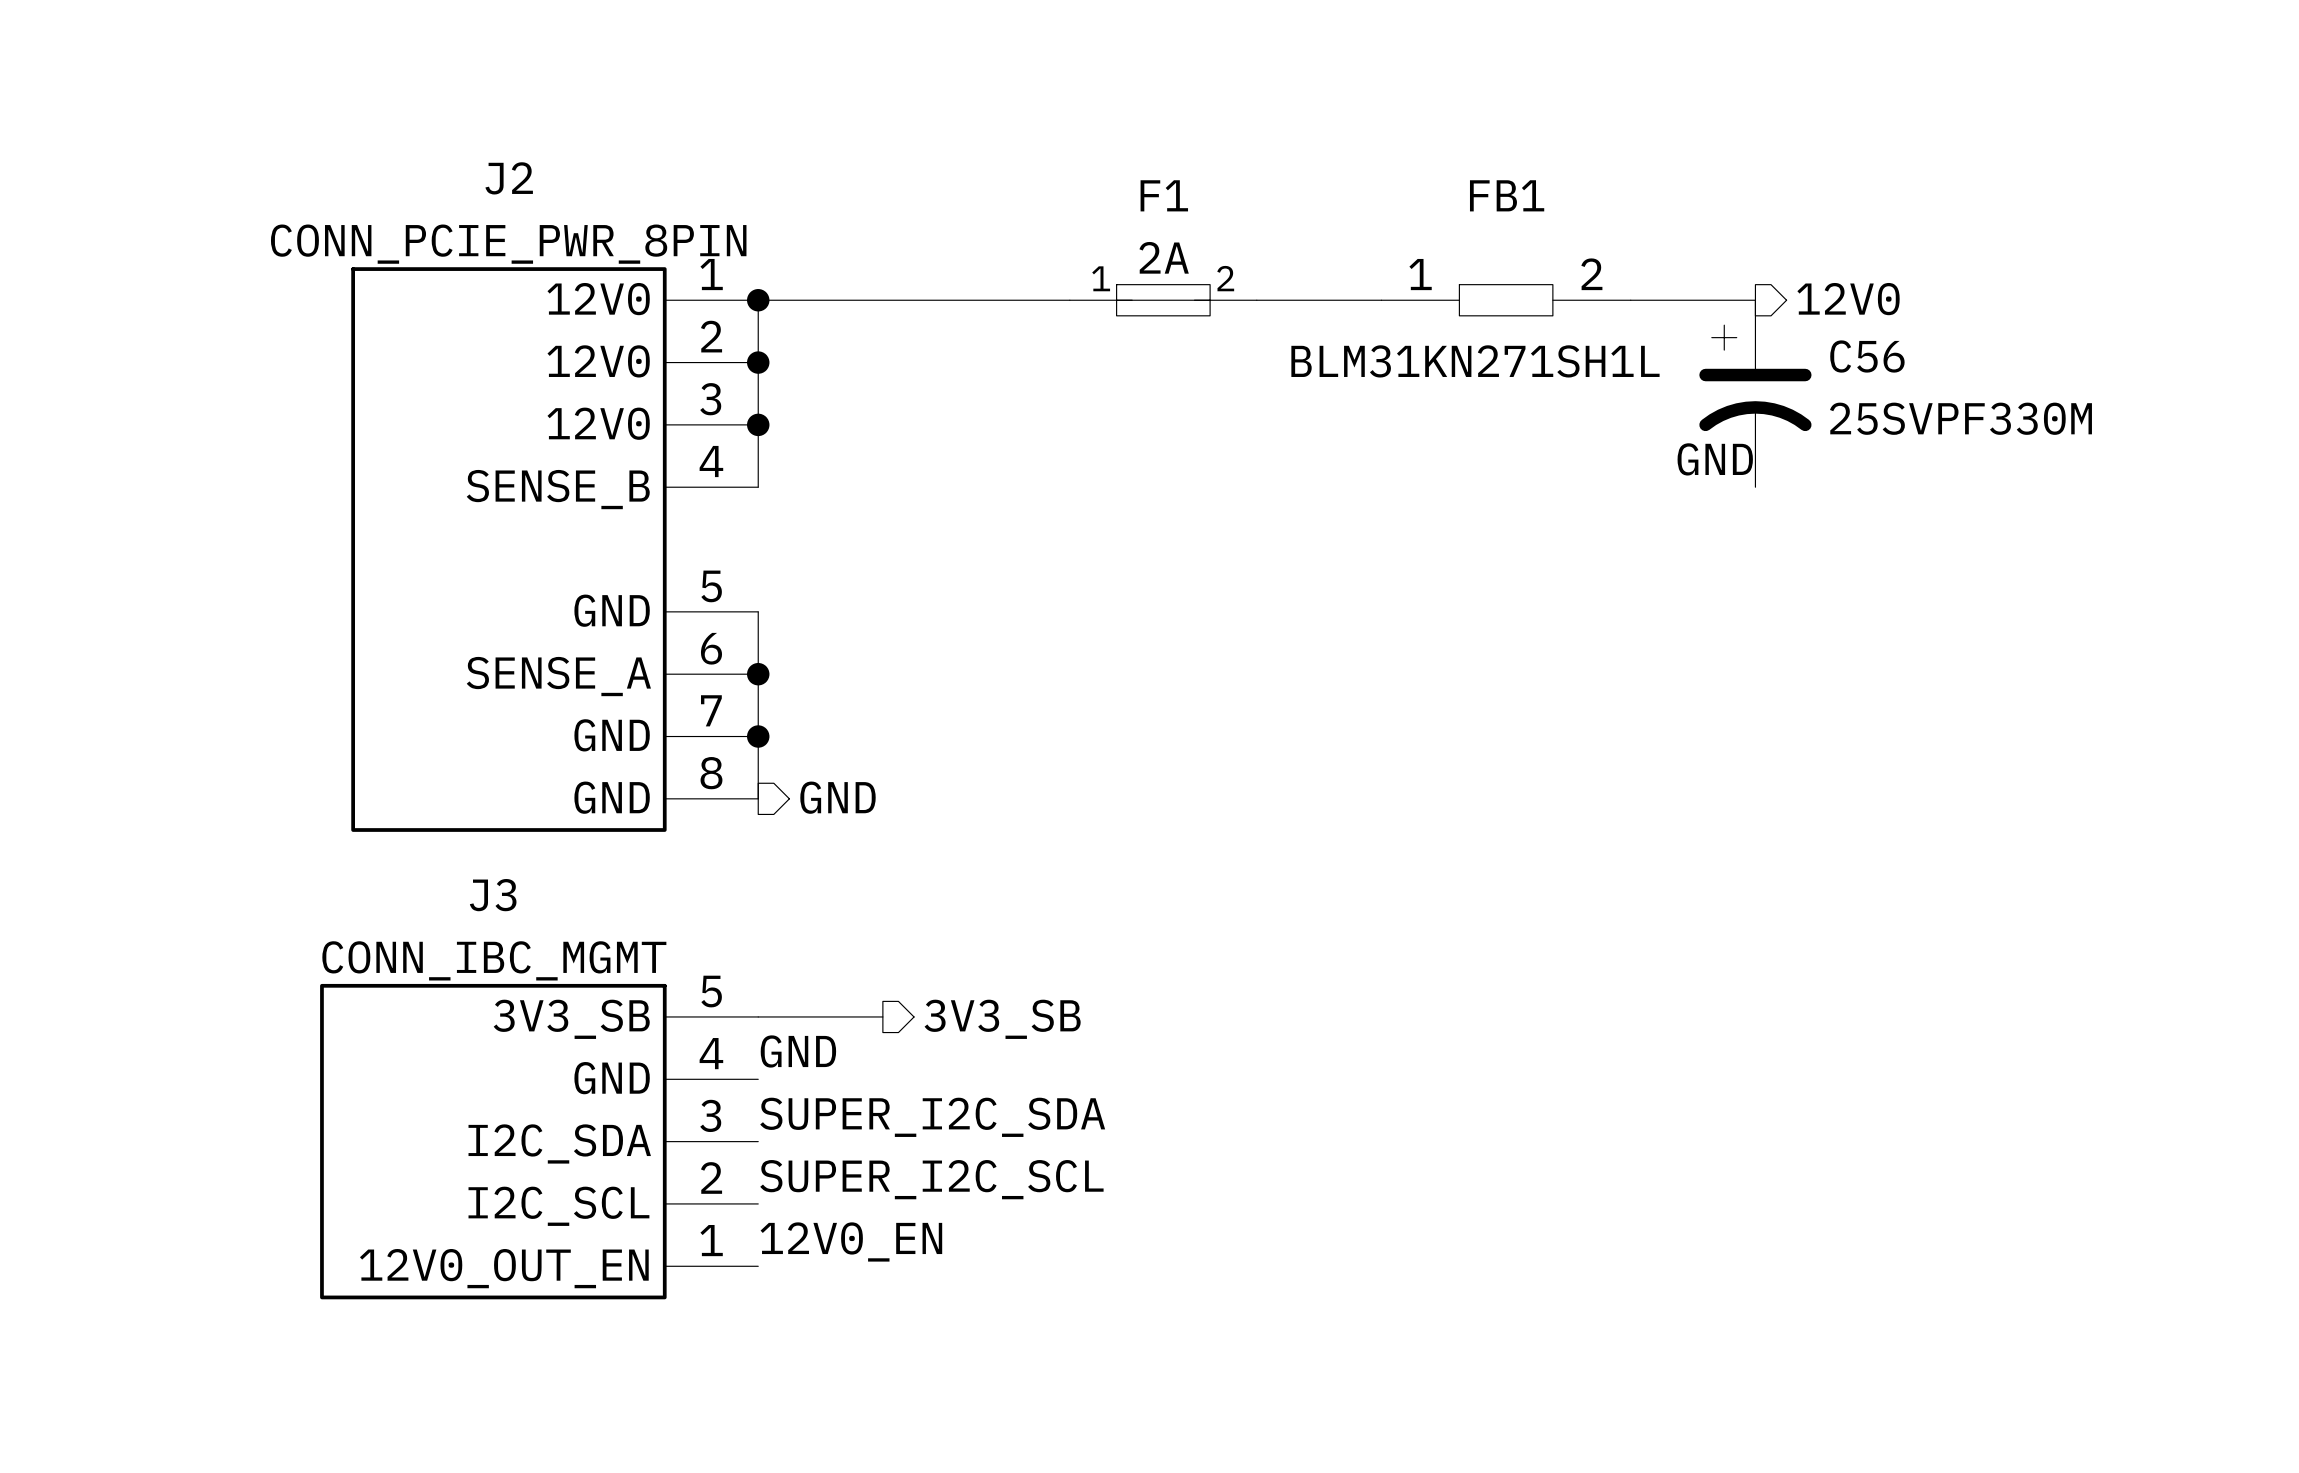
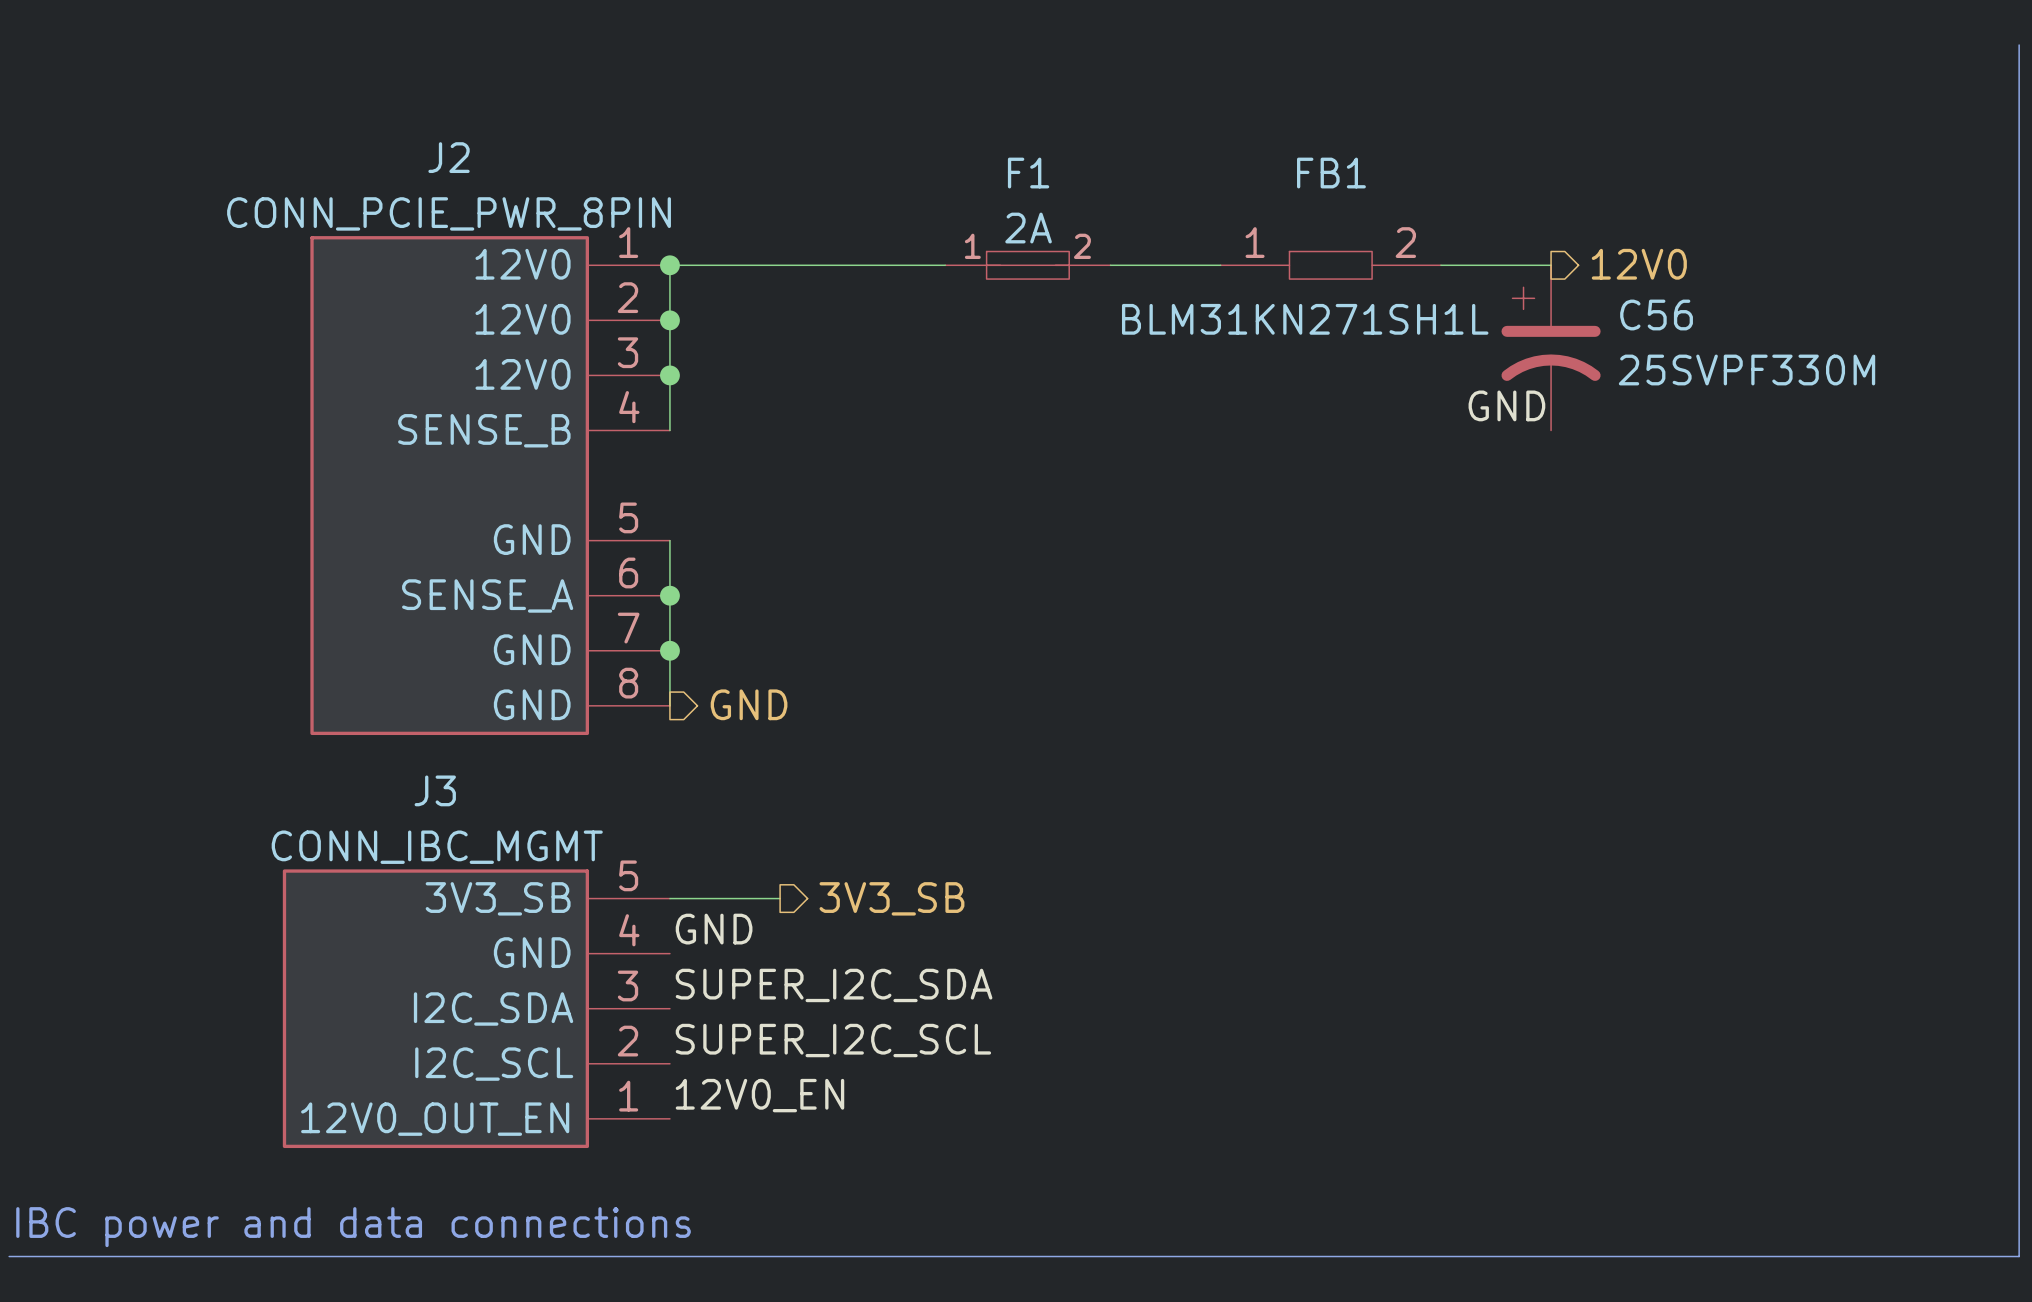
line: none -> (2019, 45) (2019, 1256) (9, 1256)
text: none -> IBC power and data connections (353, 1227)

